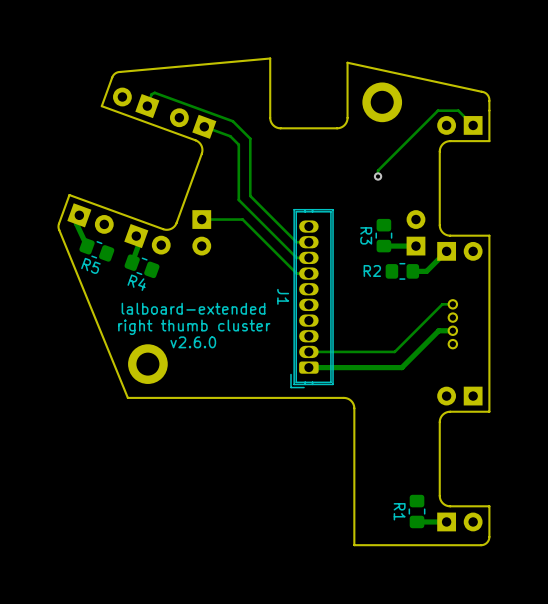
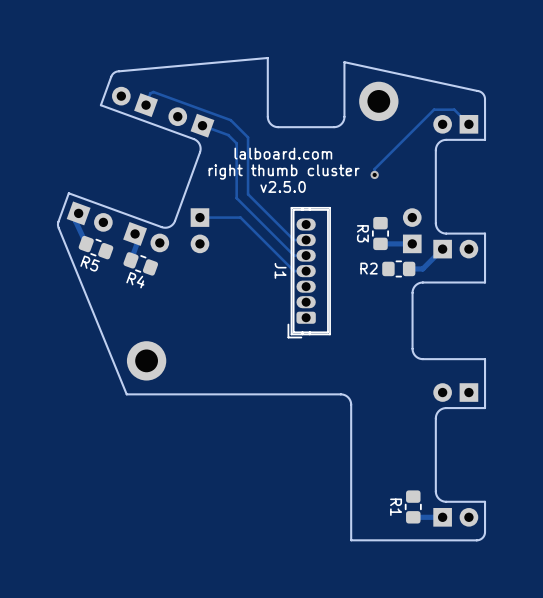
text: none -> lalboard.com (283, 153)
text: none -> v2.5.0 (283, 186)
J1 footprint: [290, 209, 334, 389] -> [287, 207, 331, 339]
board edge: (489, 285) (489, 362) -> (485, 282) (421, 282) (415, 285) (412, 292) (412, 348) (415, 356) (422, 359) (485, 359)
track: (452, 304) (442, 304) (394, 351) (308, 351) -> none
text: lalboard-extended (193, 308) -> none
part: (452, 324) -> none
text position: right thumb cluster (194, 327) -> right thumb cluster (284, 172)
track: (452, 330) (438, 330) (401, 367) (308, 367) -> none
text: v2.6.0 (193, 342) -> none

